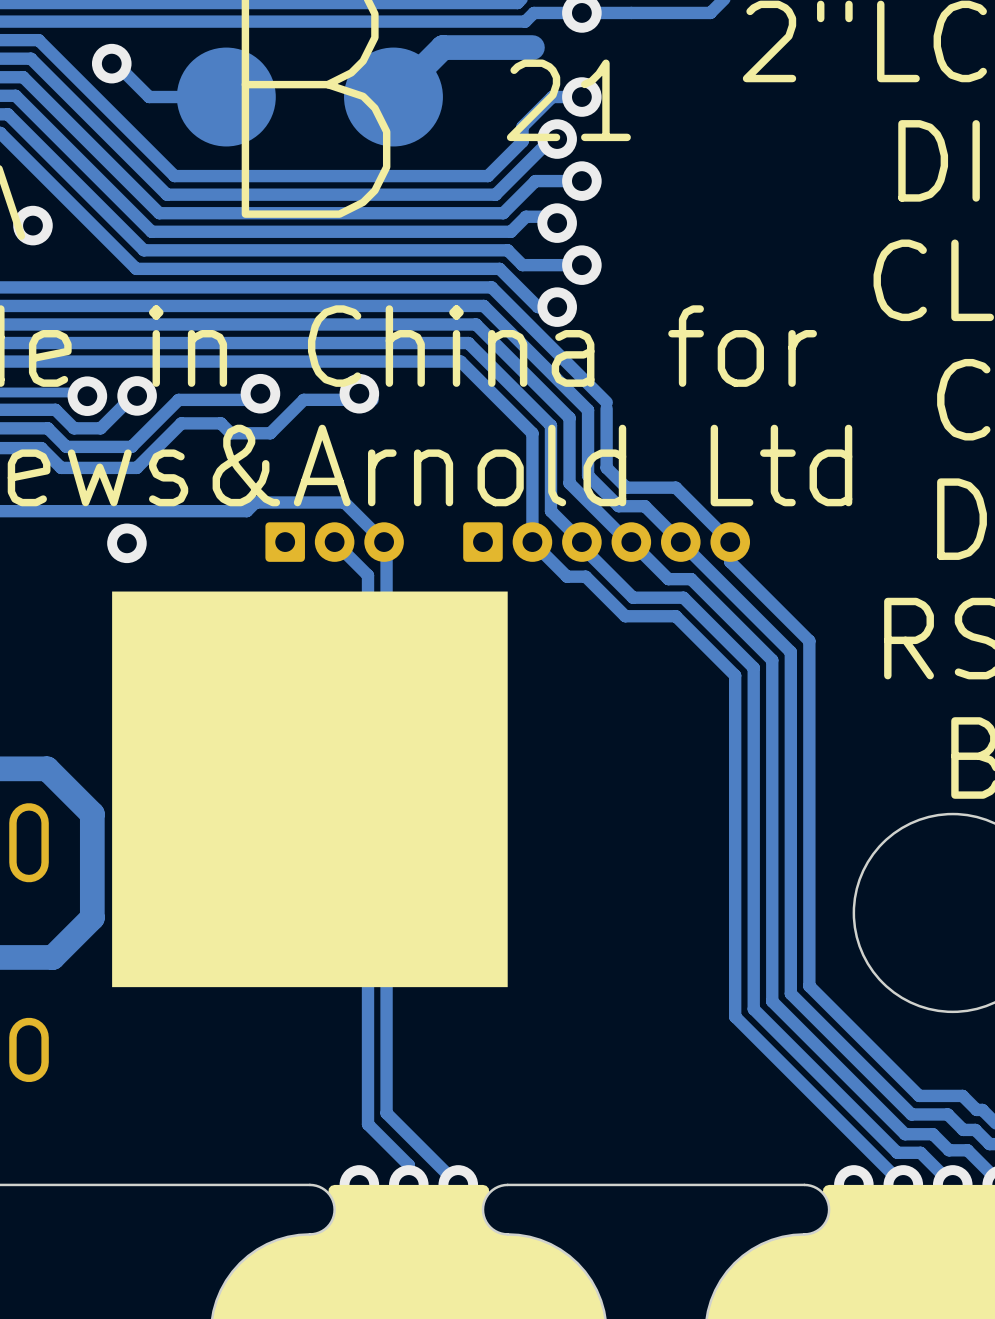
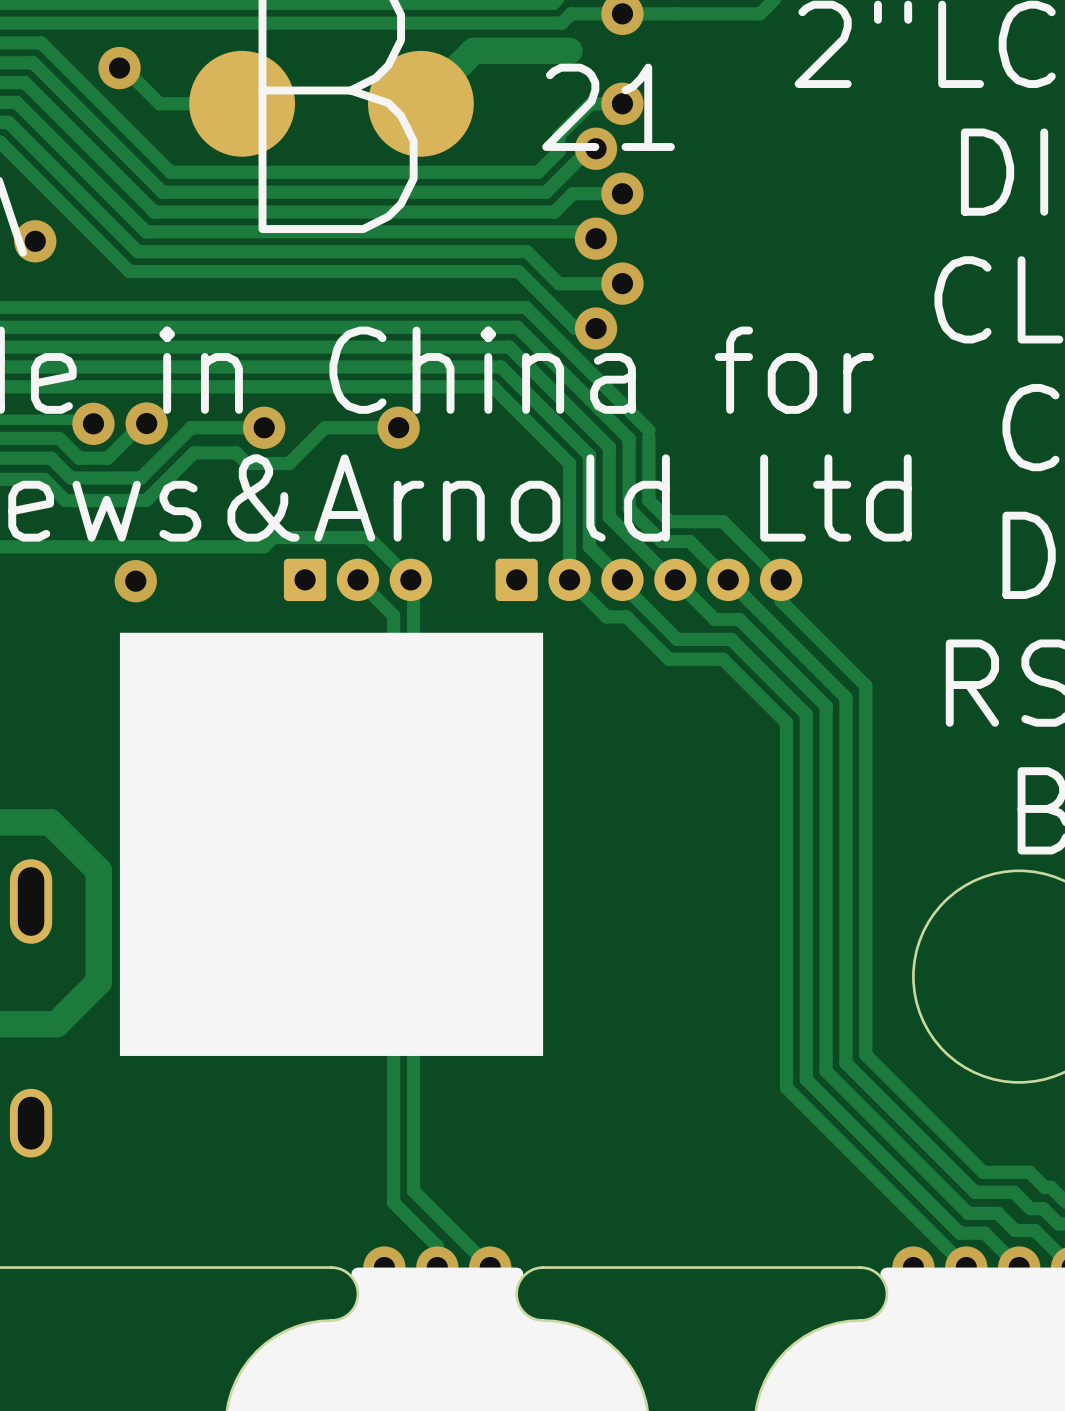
track: (502, 161) (487, 176) (174, 176) (159, 161) -> (538, 172) (170, 172)
track: (510, 179) (495, 194) (166, 194) (151, 179) -> (546, 192) (162, 192)
track: (518, 198) (503, 213) (159, 213) (144, 198) -> (554, 212) (154, 212)
track: (526, 216) (510, 231) (151, 231) (136, 216) -> (562, 231) (146, 231)
track: (128, 235) (143, 250) (507, 250) -> (137, 251) (527, 251) (543, 267)
track: (121, 253) (136, 268) (499, 268) -> (129, 271) (518, 271) (534, 287)
via position: (260, 393) -> (264, 427)
via position: (359, 393) -> (398, 427)

